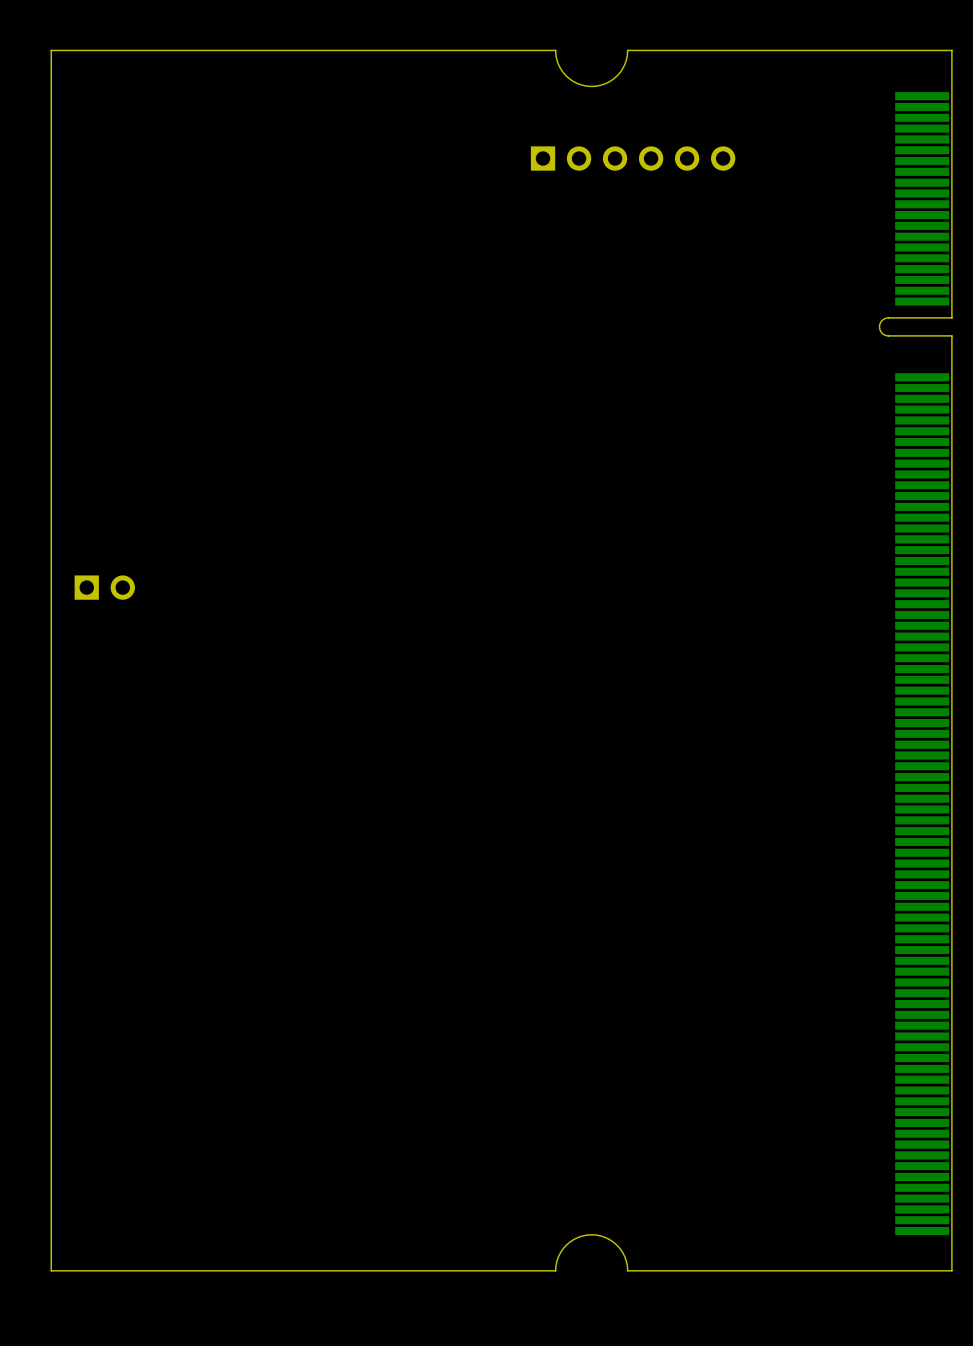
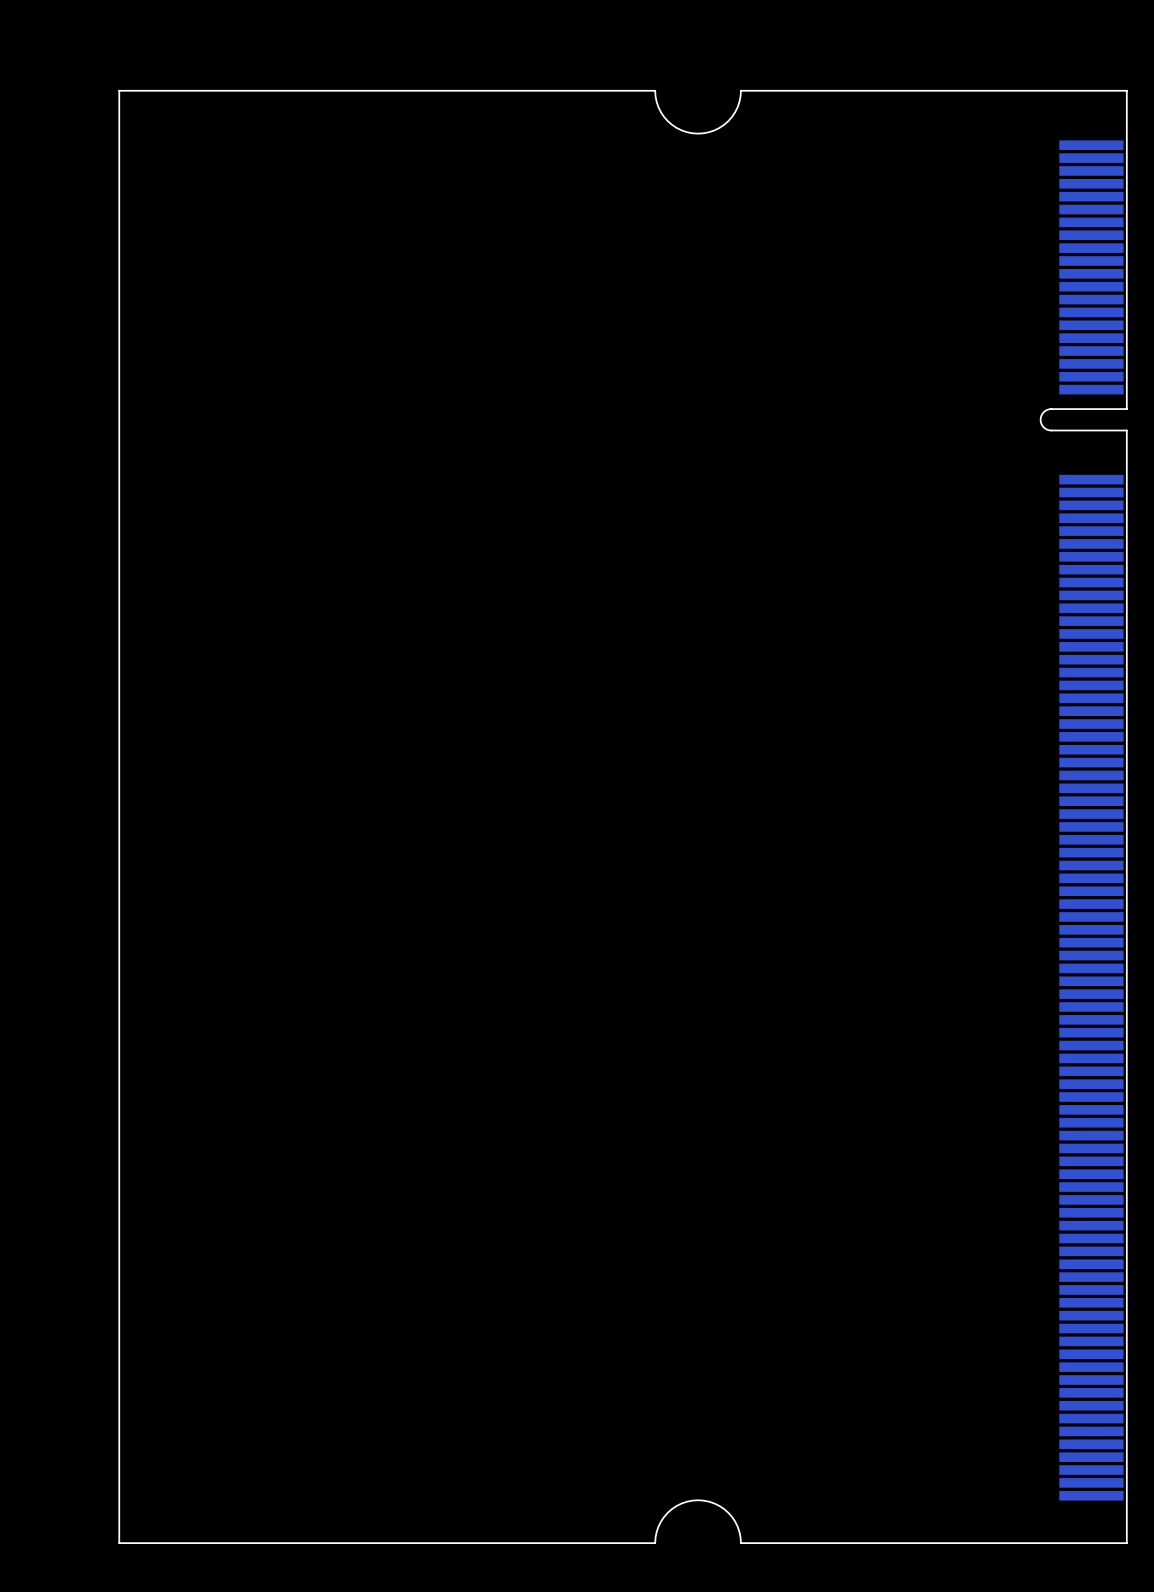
board edge: (105, 50) (51, 50) (51, 1270) (105, 1270) -> (119, 90) (119, 1543)
part: (633, 158) -> none
part: (104, 587) -> none

